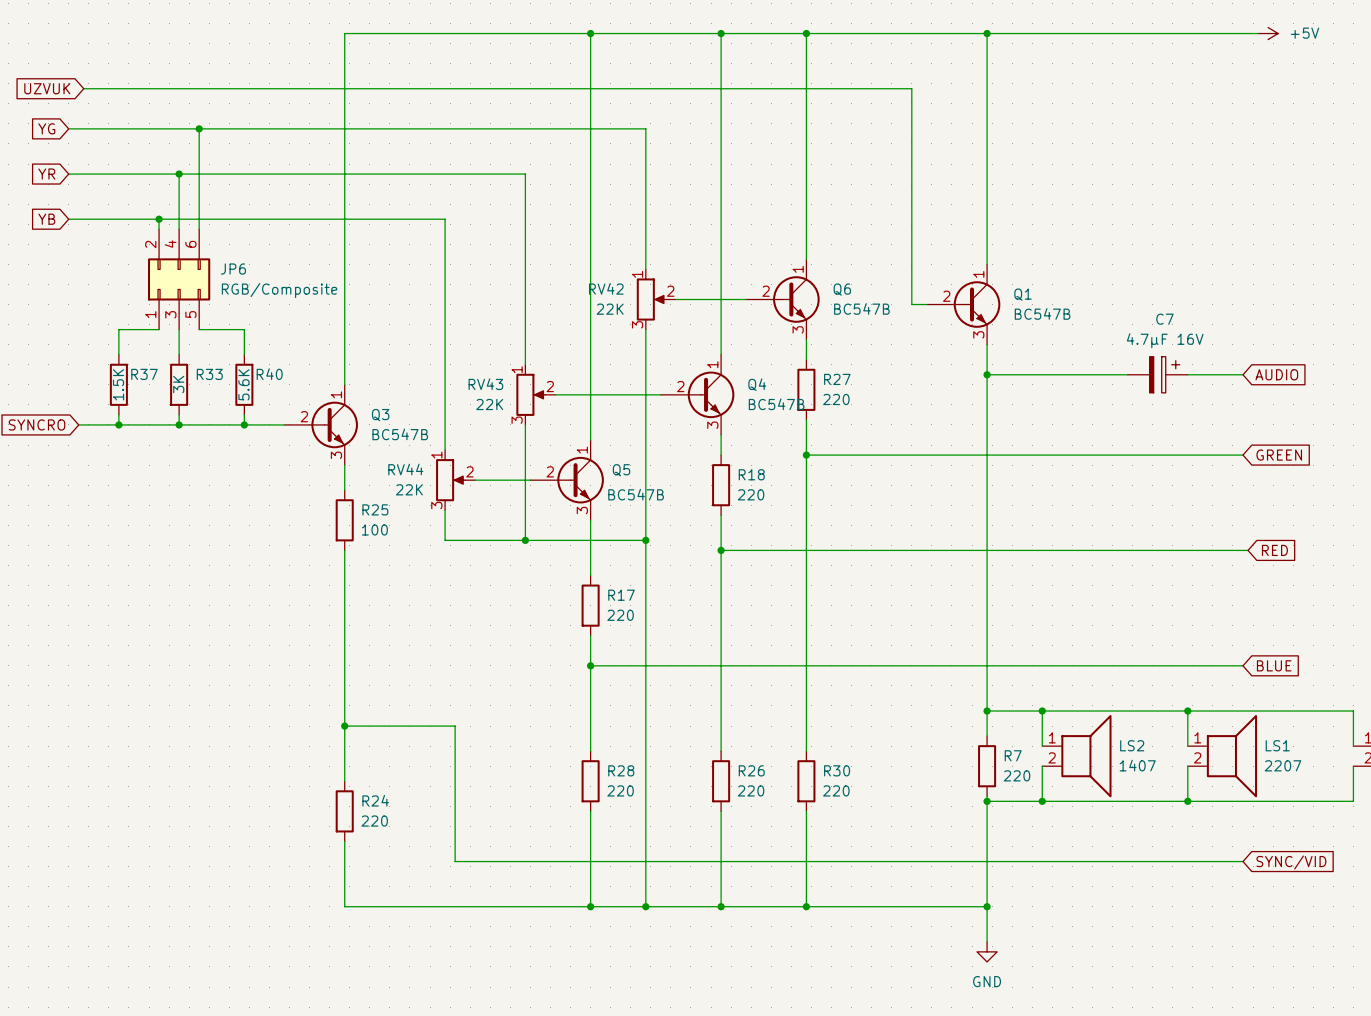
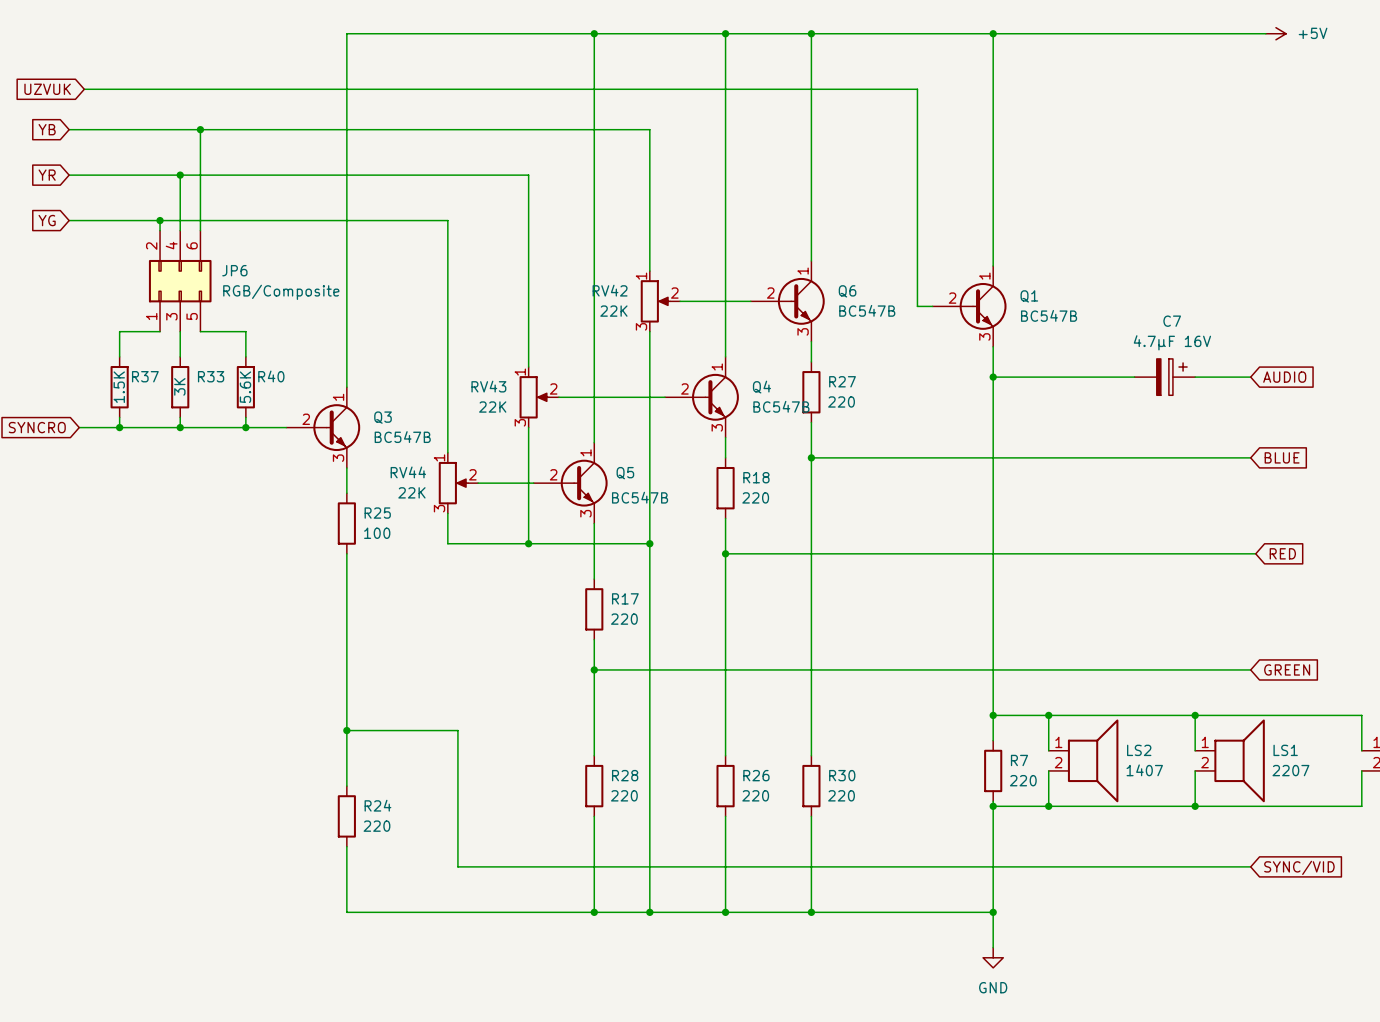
global label: YG (46, 128) -> YB (47, 129)
global label: YB (46, 219) -> YG (47, 220)
global label: GREEN (1279, 455) -> BLUE (1282, 457)
global label: BLUE (1274, 665) -> GREEN (1287, 669)

